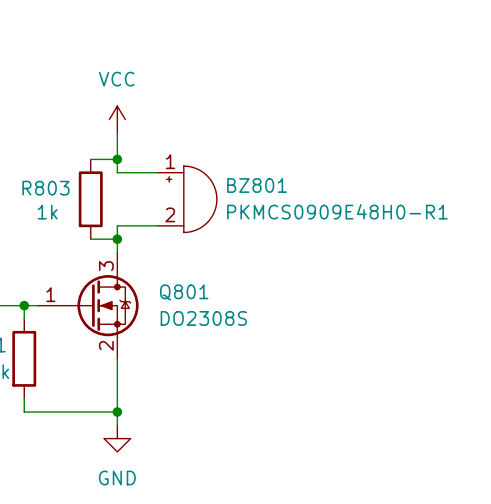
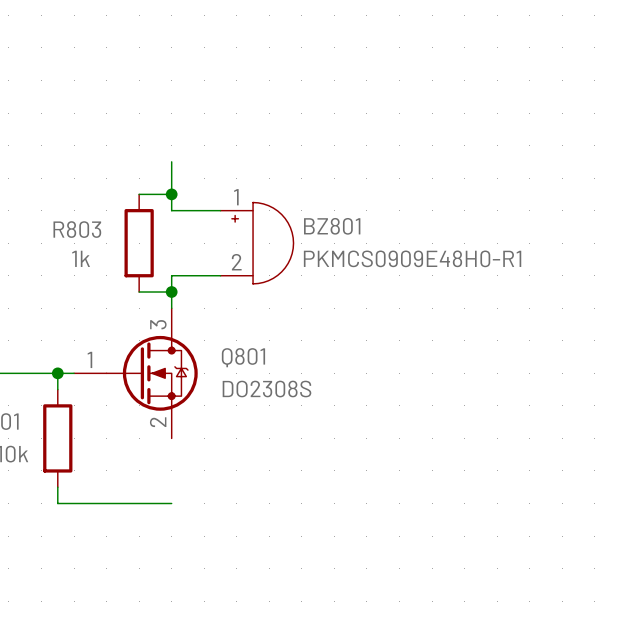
power symbol: VCC (117, 119) -> none
wire: (117, 358) (117, 425) -> none
junction: (117, 412) -> none
power symbol: GND (117, 438) -> none

